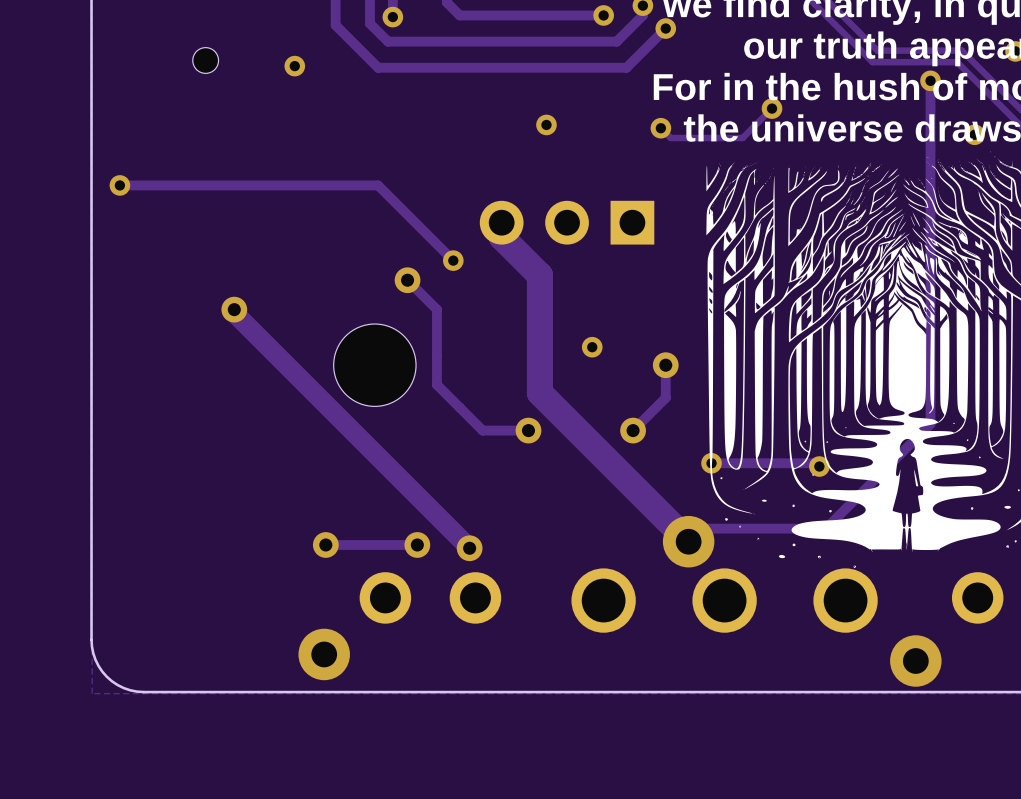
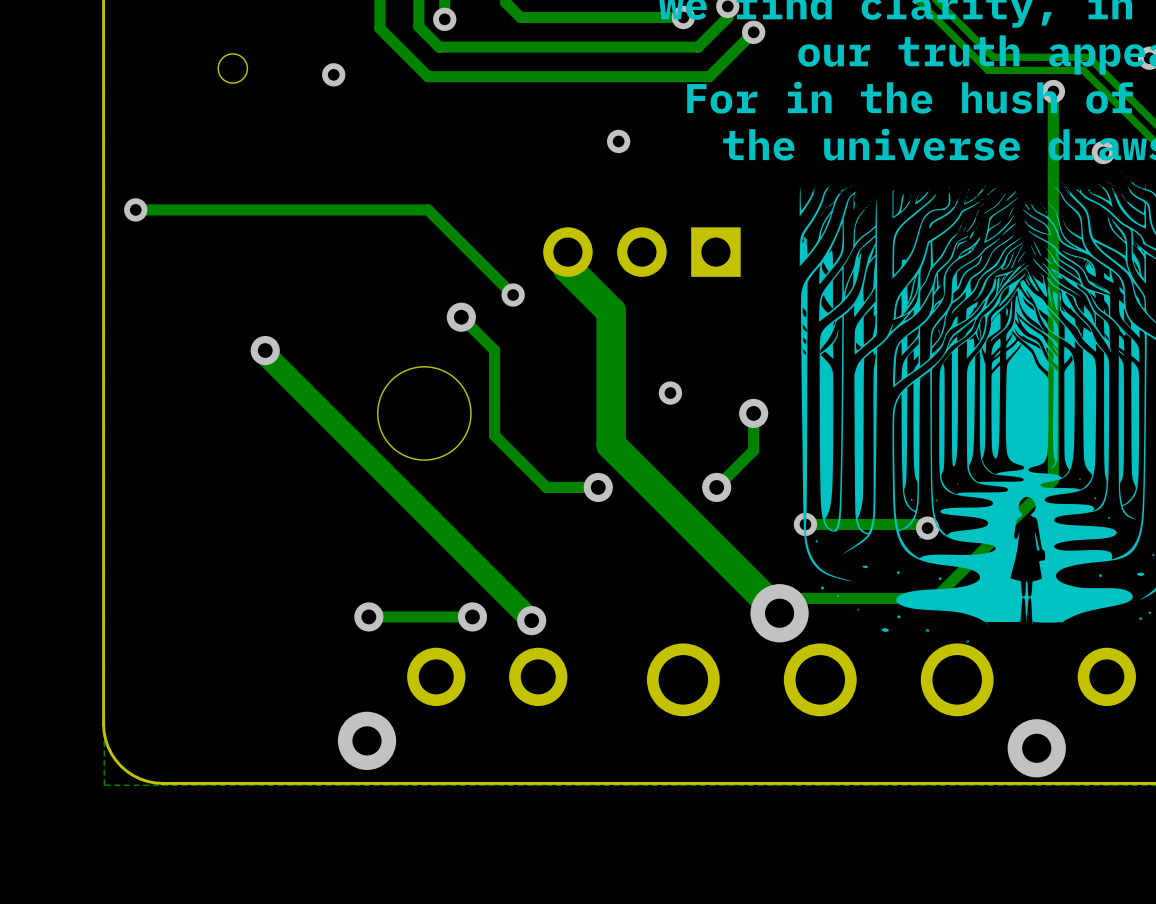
track: (772, 108) (742, 138) (670, 138) (660, 128) -> none
via: (772, 108) -> none
via: (660, 128) -> none

